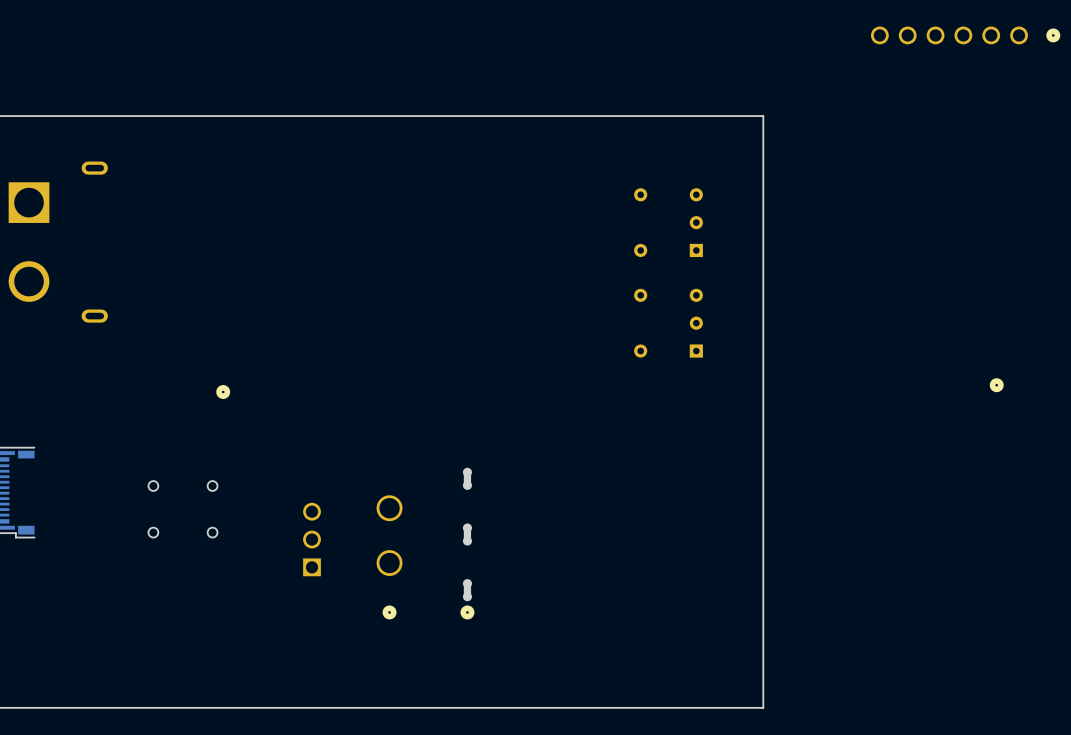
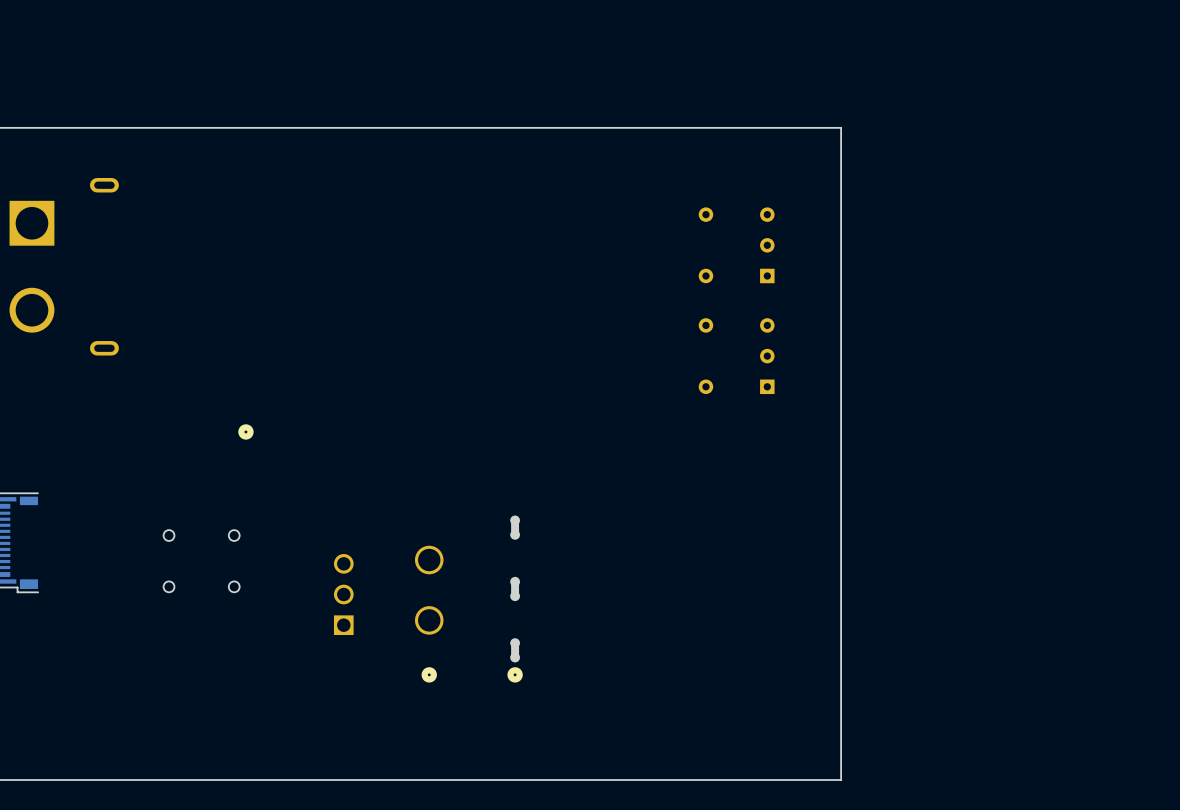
part: (965, 35) -> none
part: (996, 385) -> none

